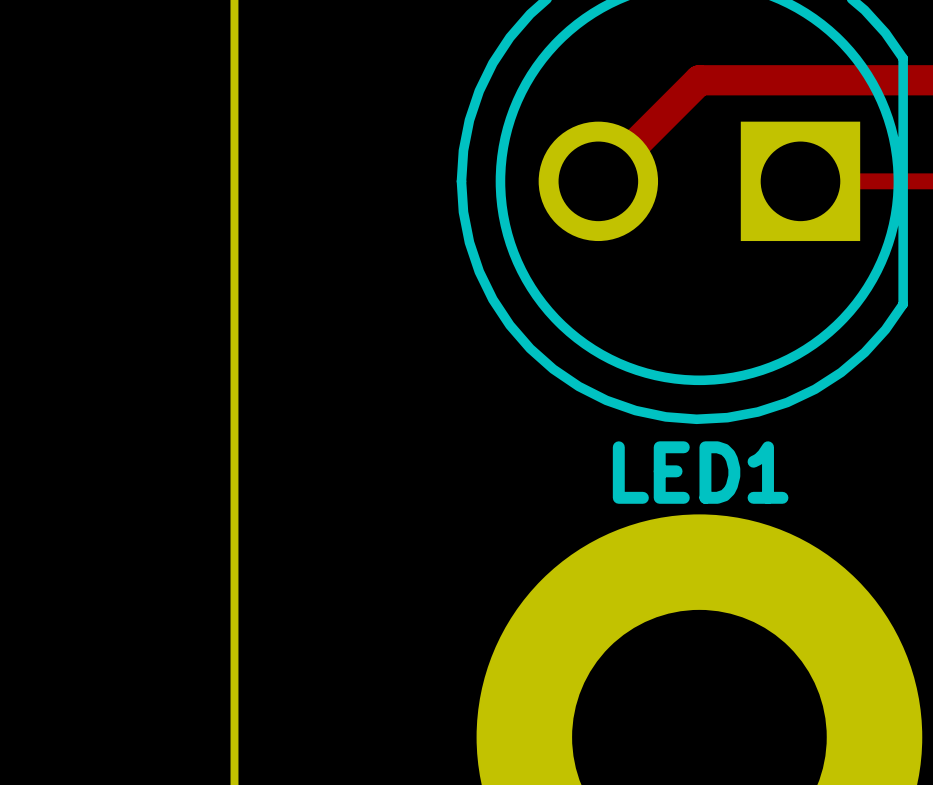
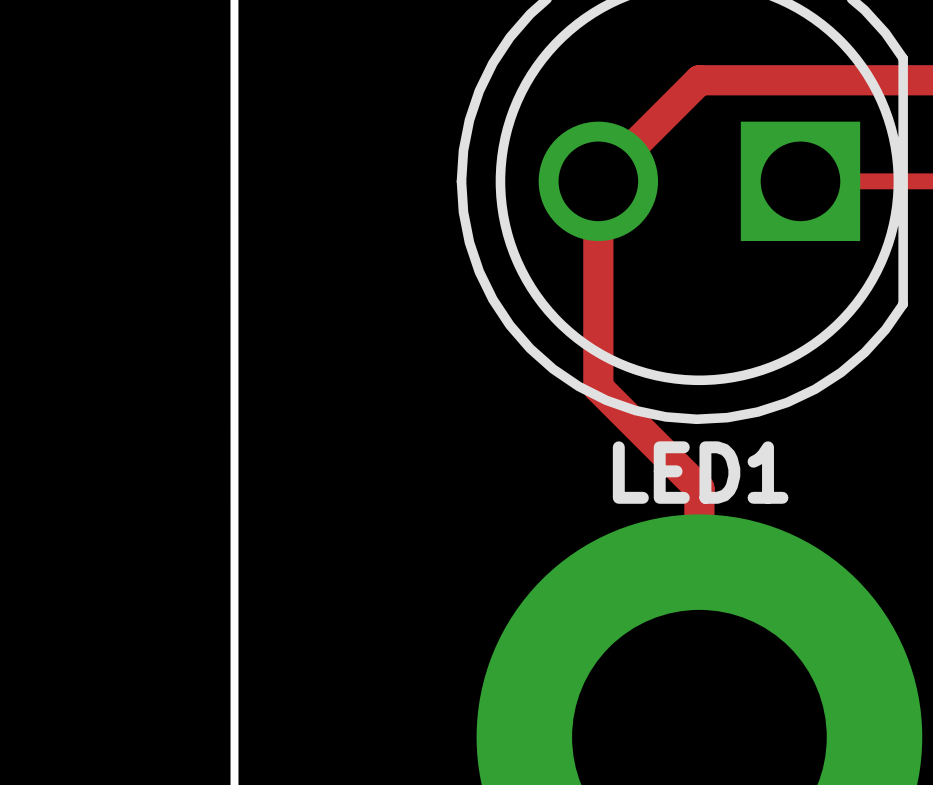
track: none -> (598, 181) (598, 387) (699, 488) (699, 737)

